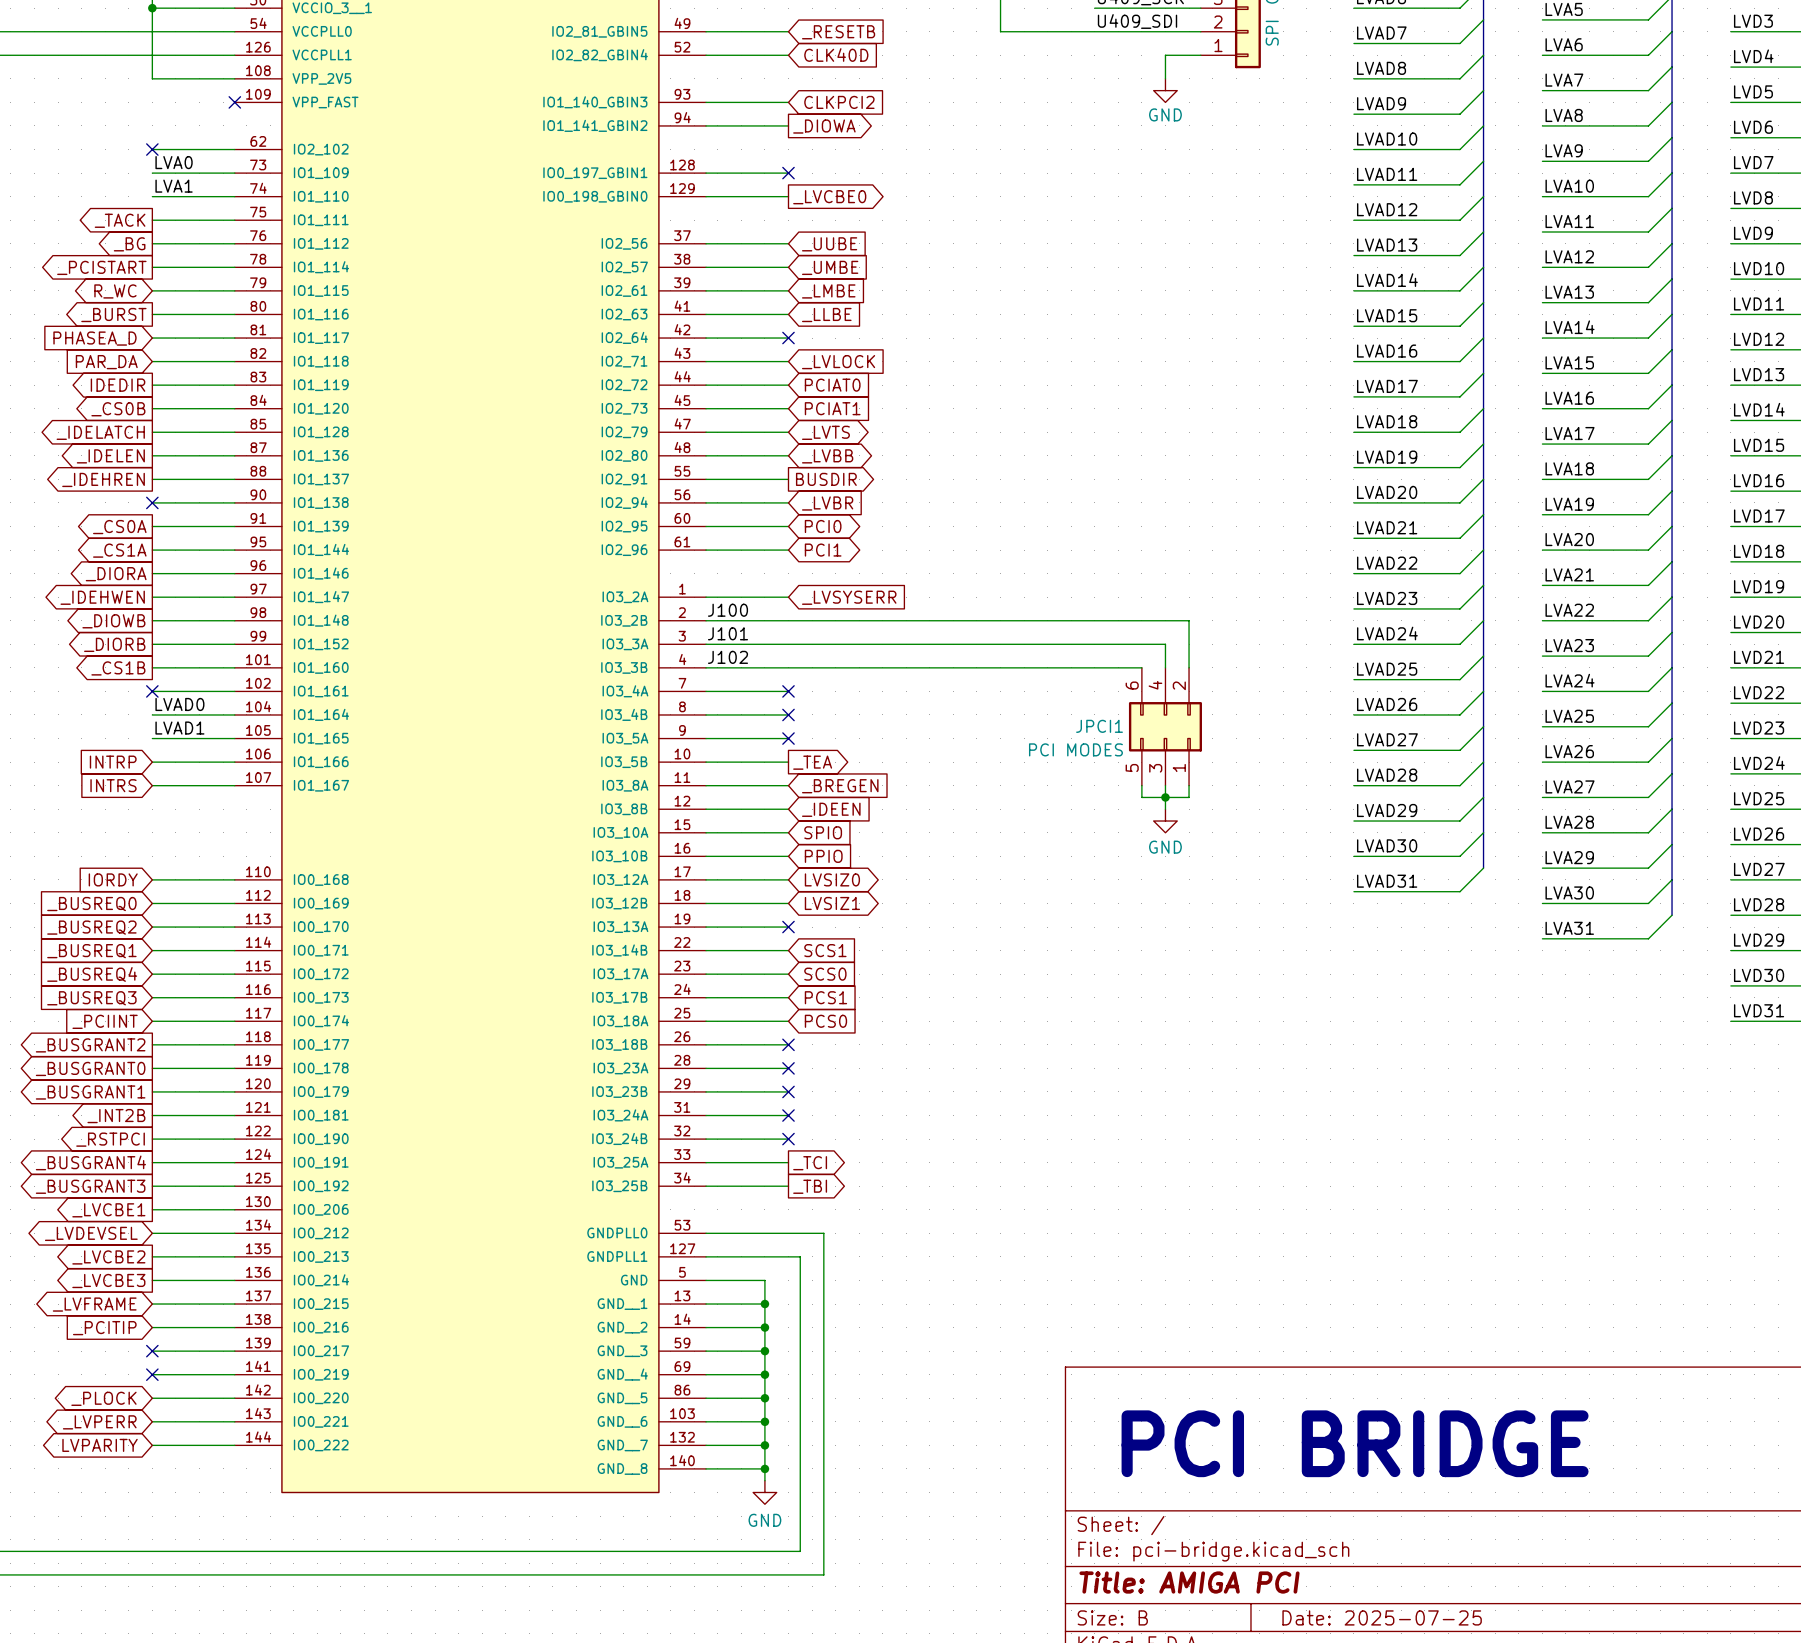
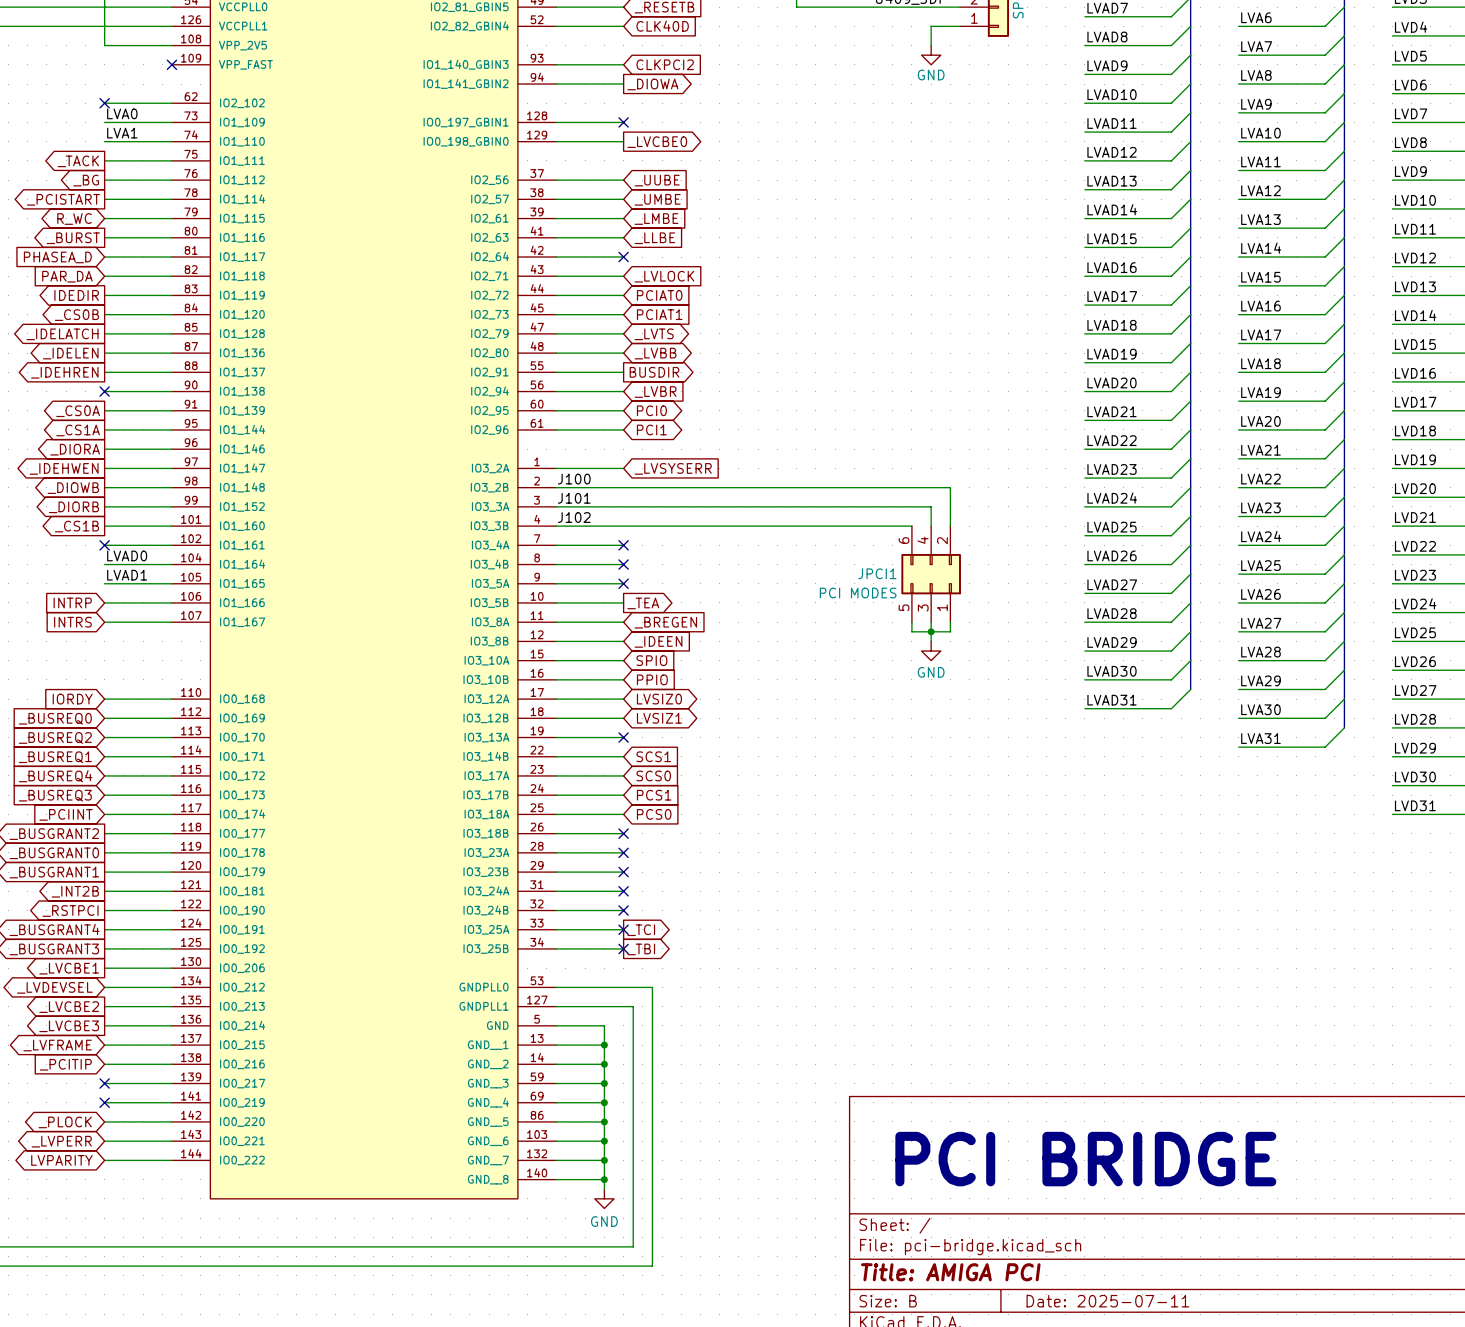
no-connect mark: none -> (623, 929)
no-connect mark: none -> (623, 948)
title block: Date: 2025-07-25 (1382, 1617) -> Date: 2025-07-11 (1107, 1301)

